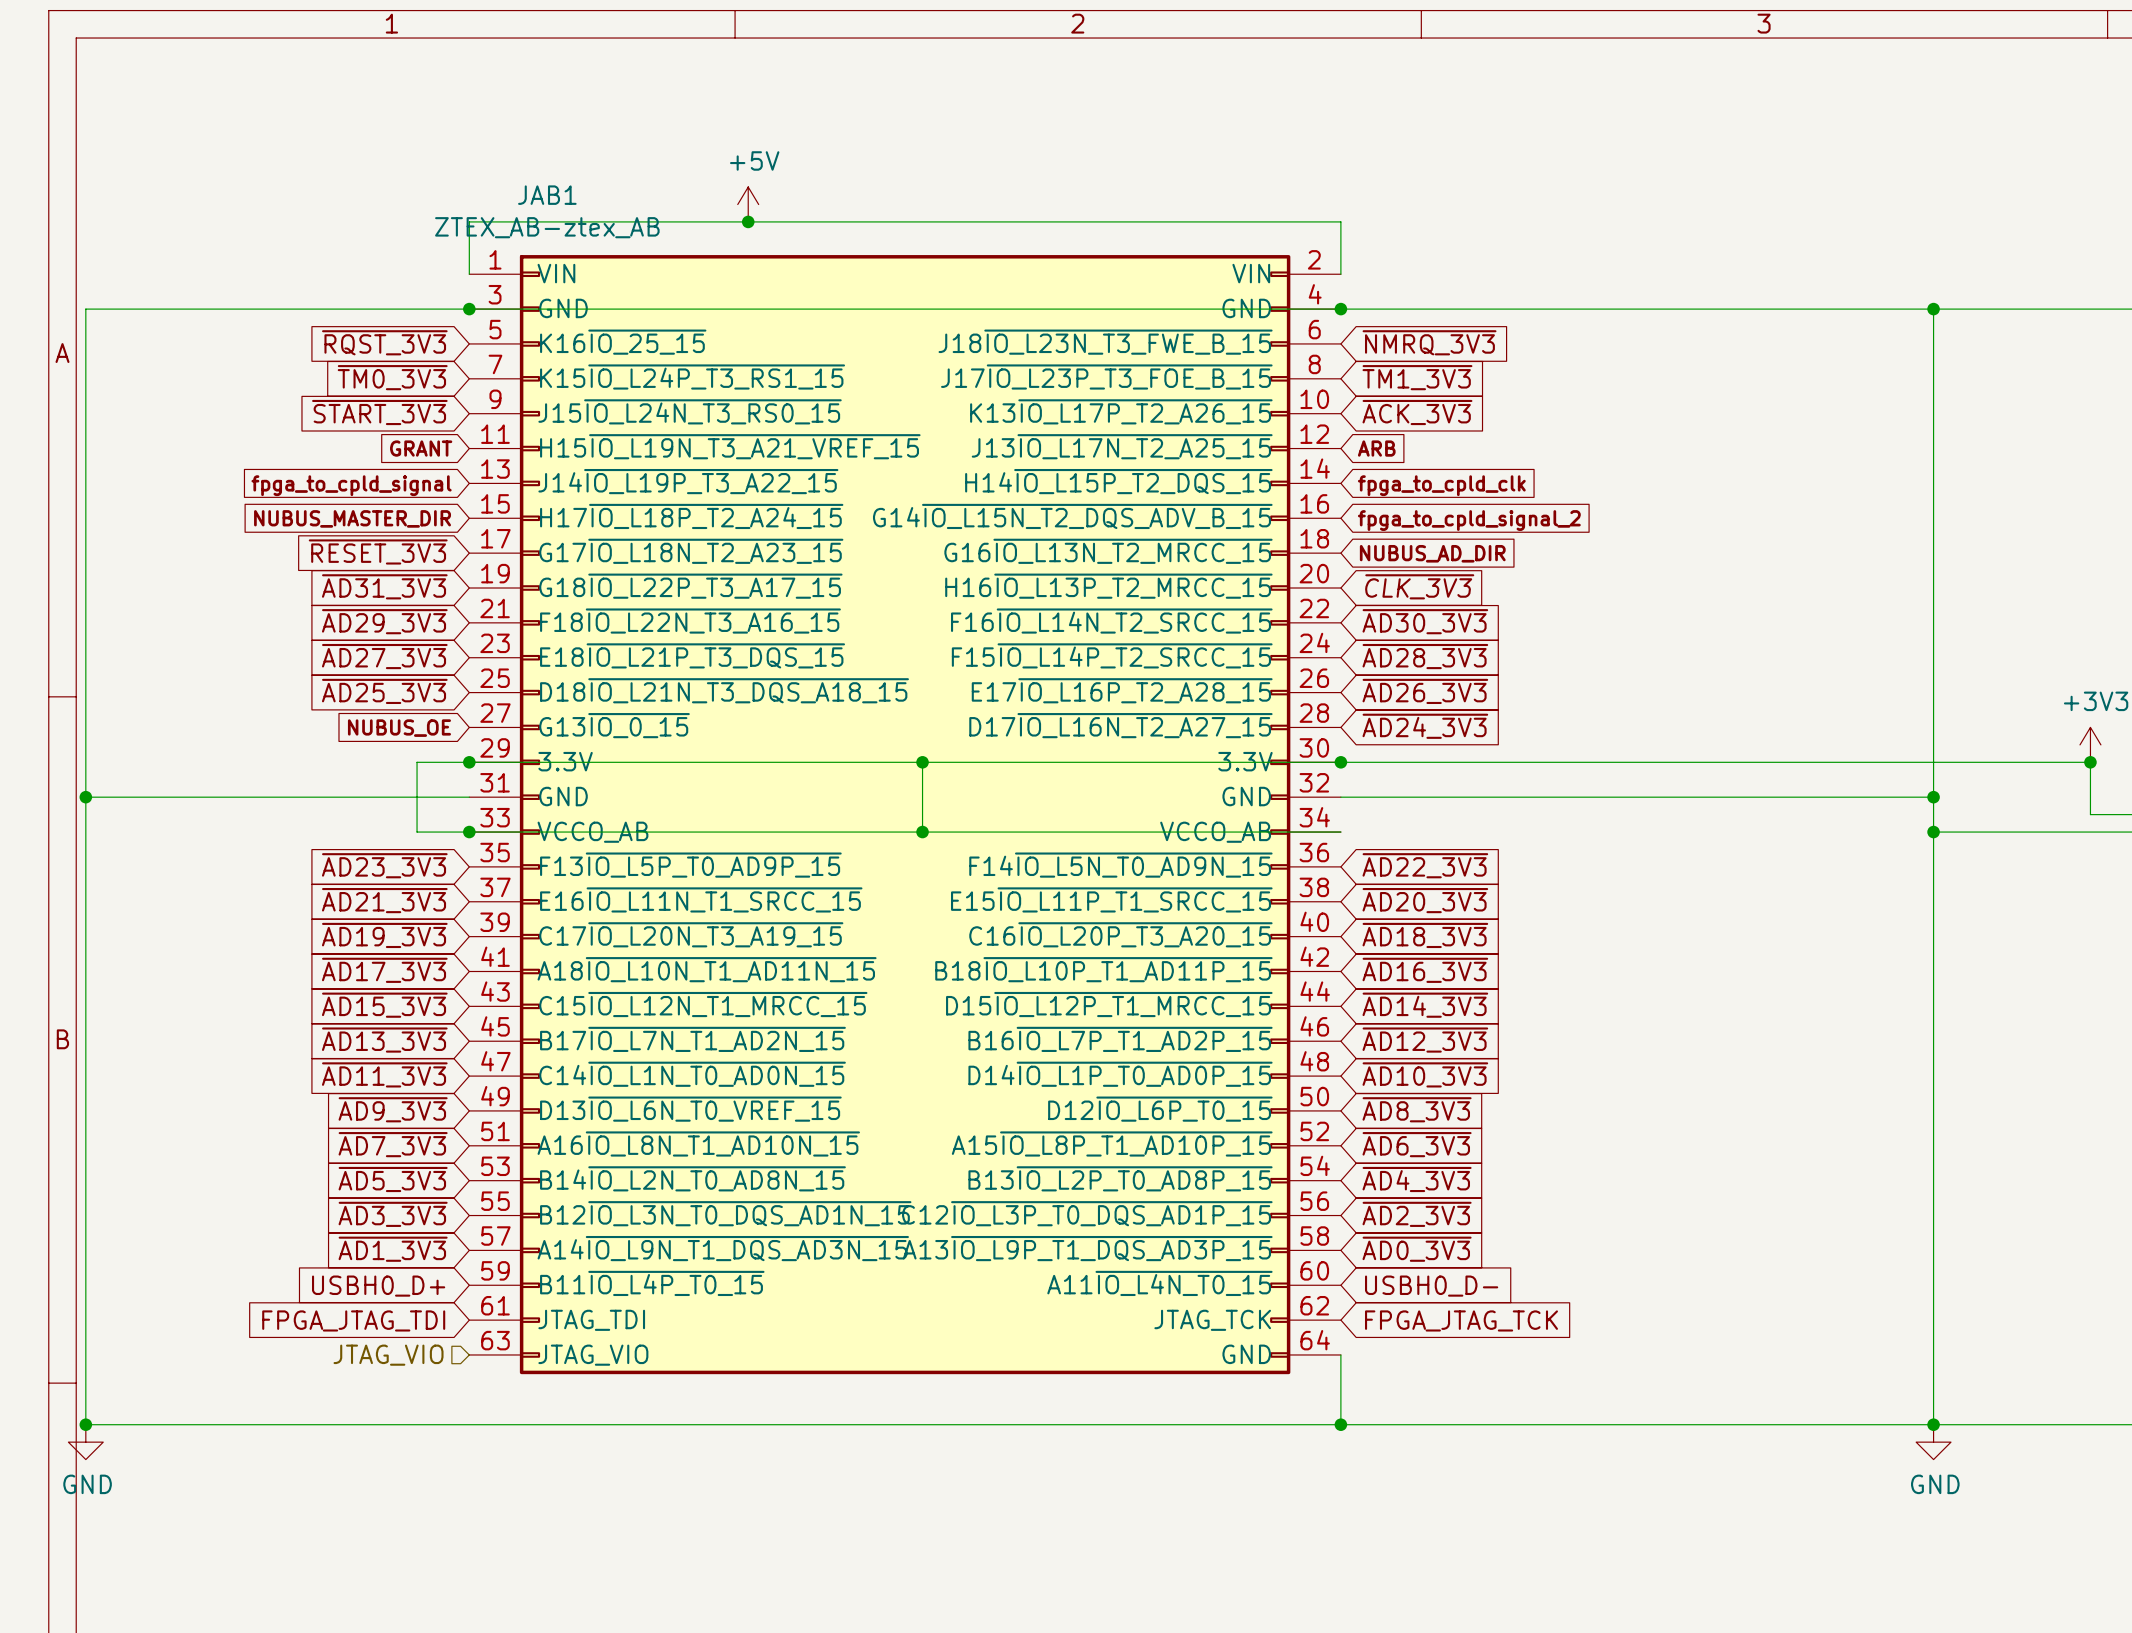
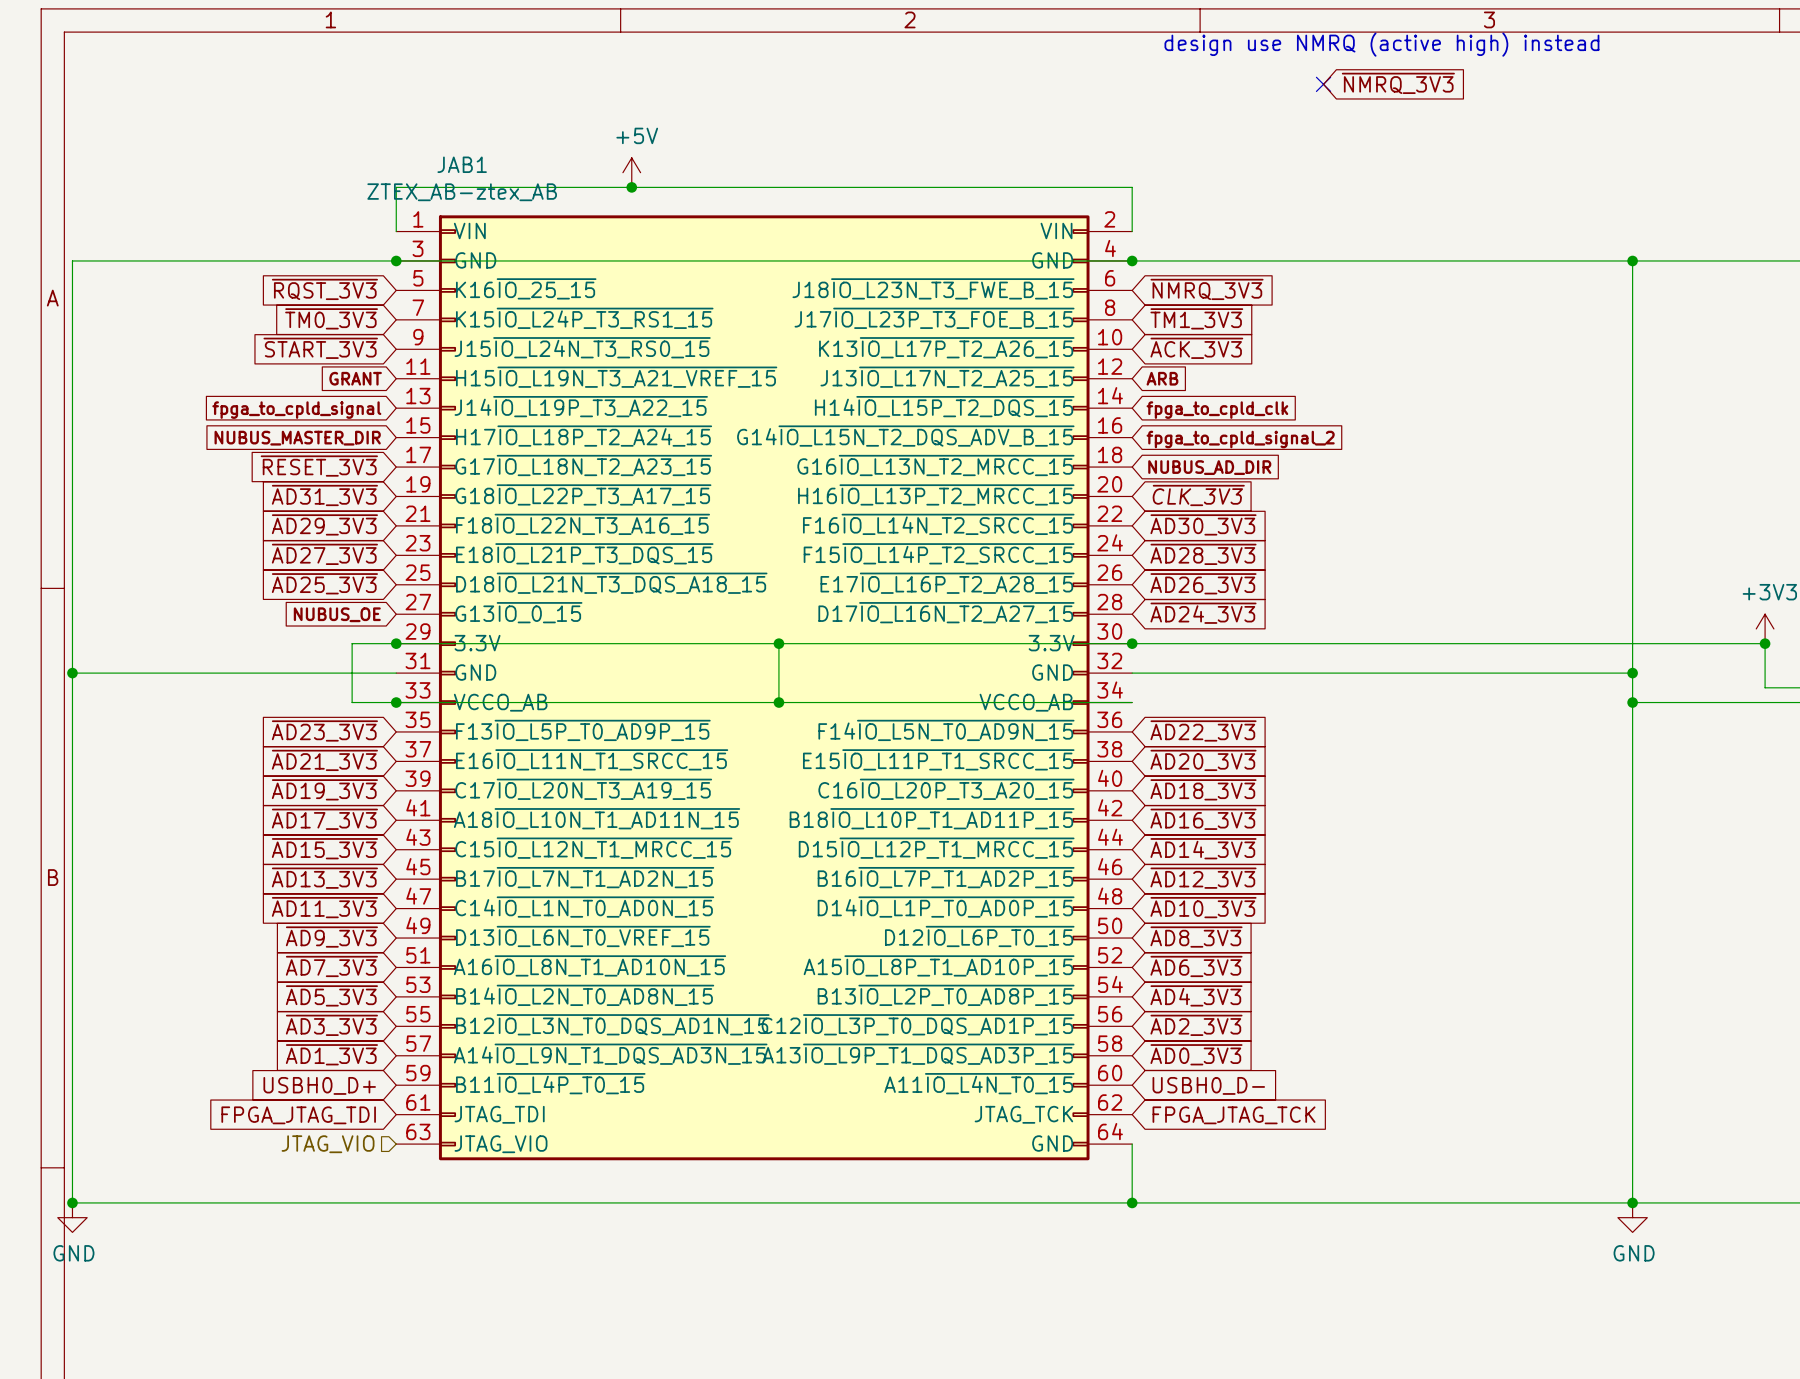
text: none -> design use NMRQ (active high) instead (1381, 44)
global label: none -> ~{NMRQ_3V3} (1398, 83)
no-connect mark: none -> (1323, 84)

